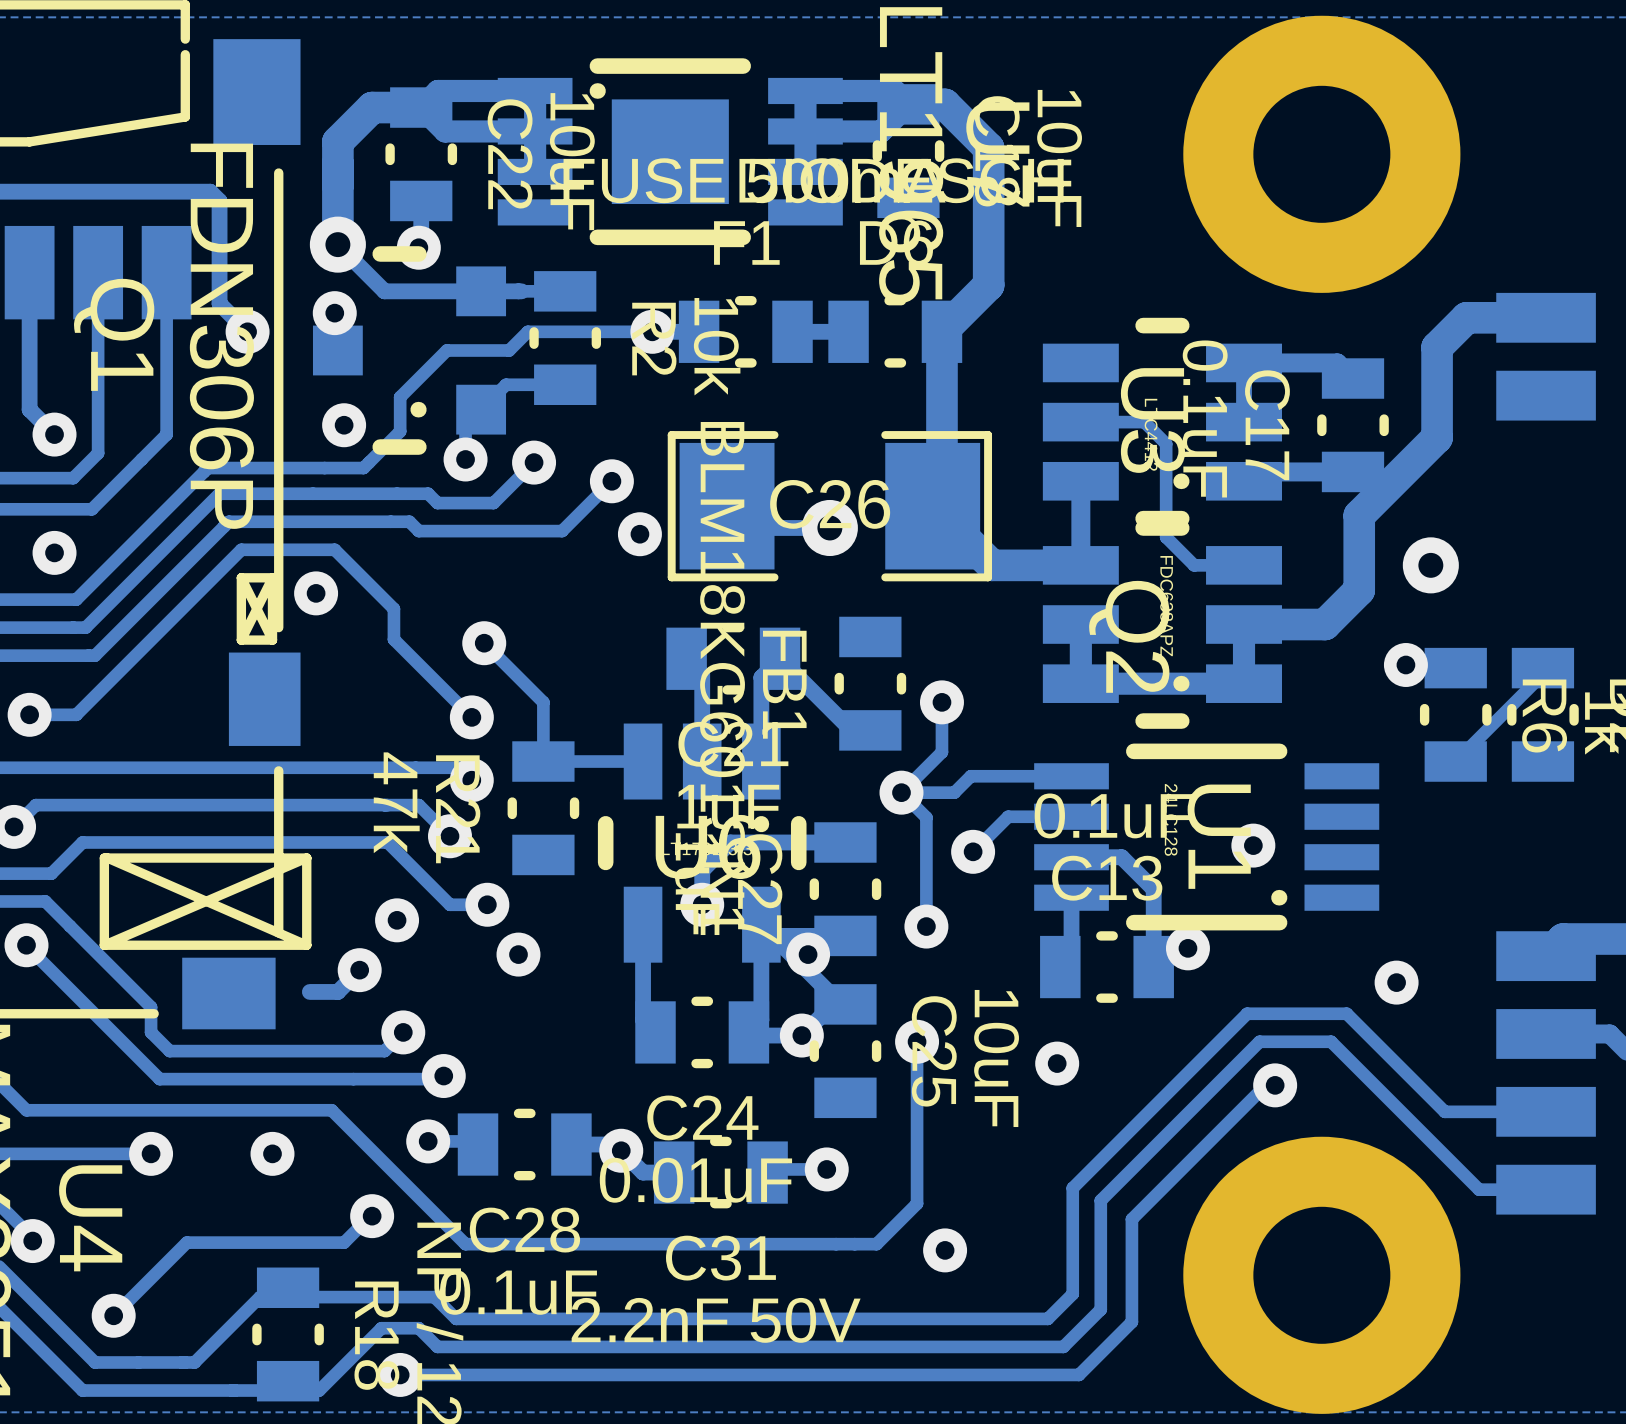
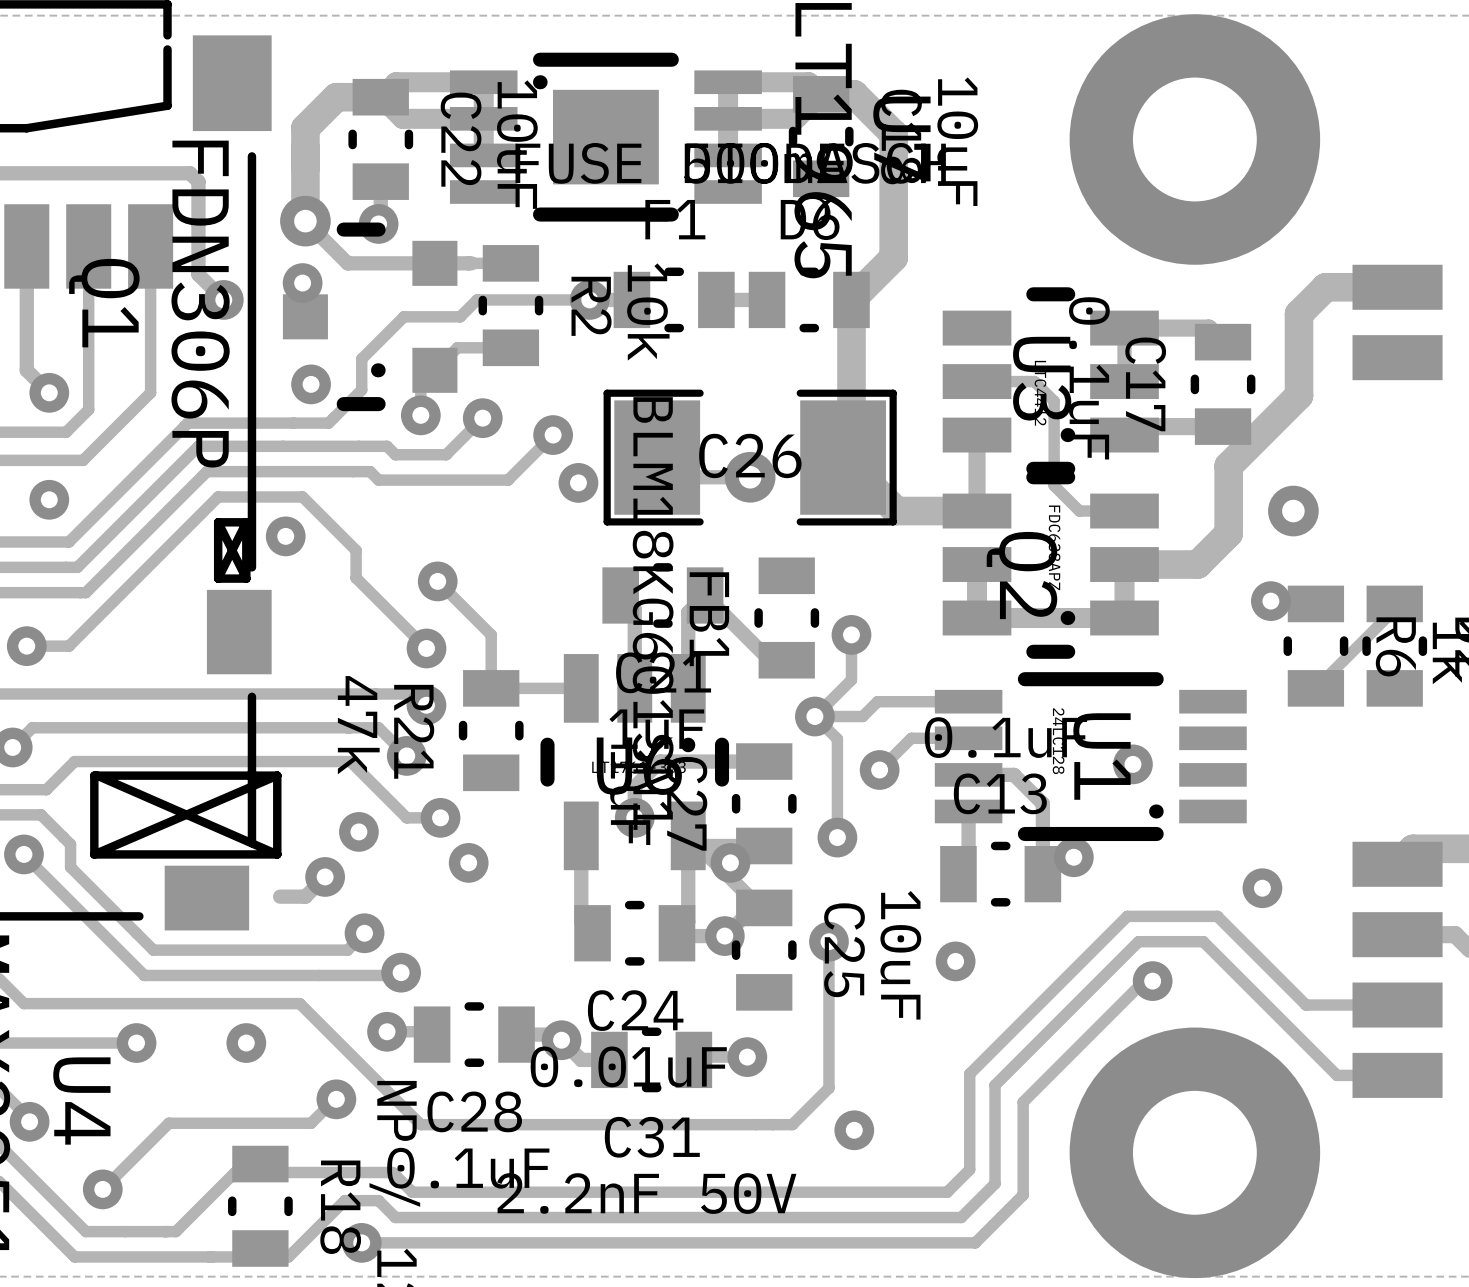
track: (78, 934) (151, 1007) (151, 1032) -> (70, 844) (70, 867) (136, 933)

